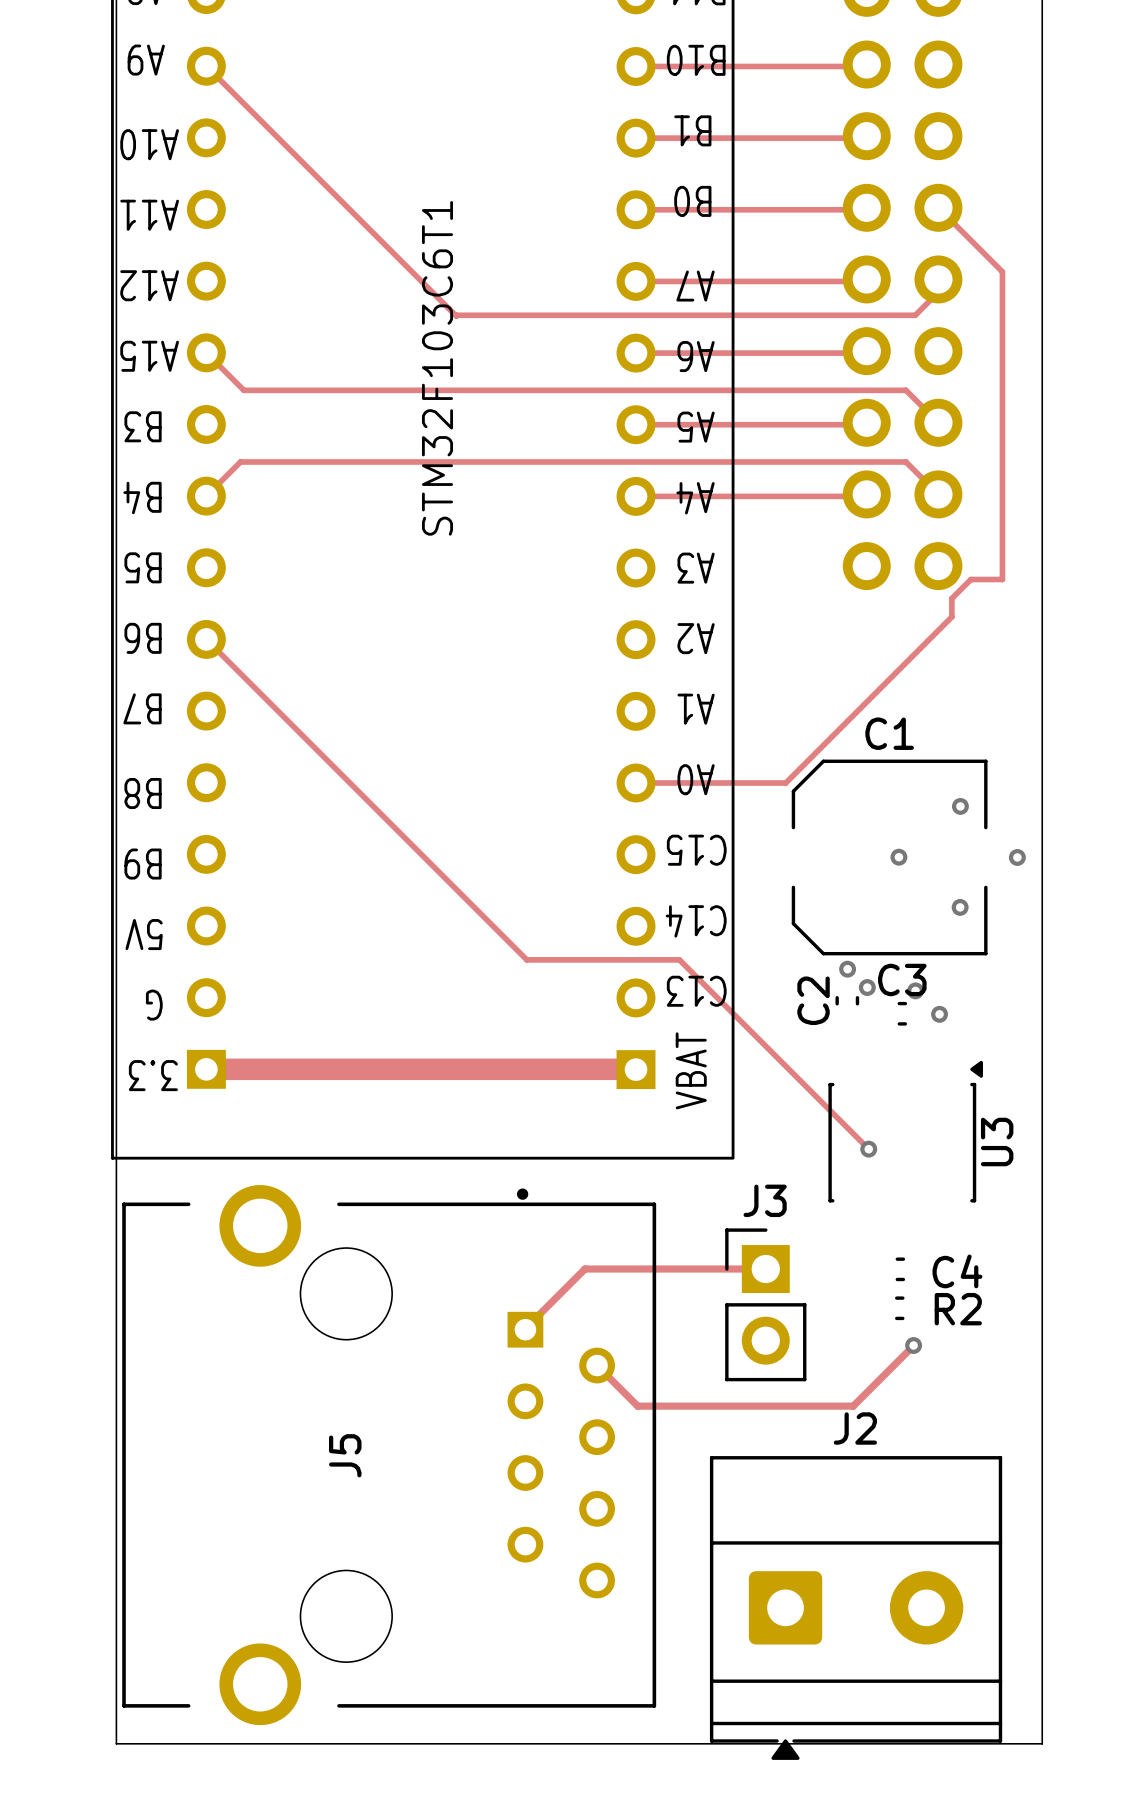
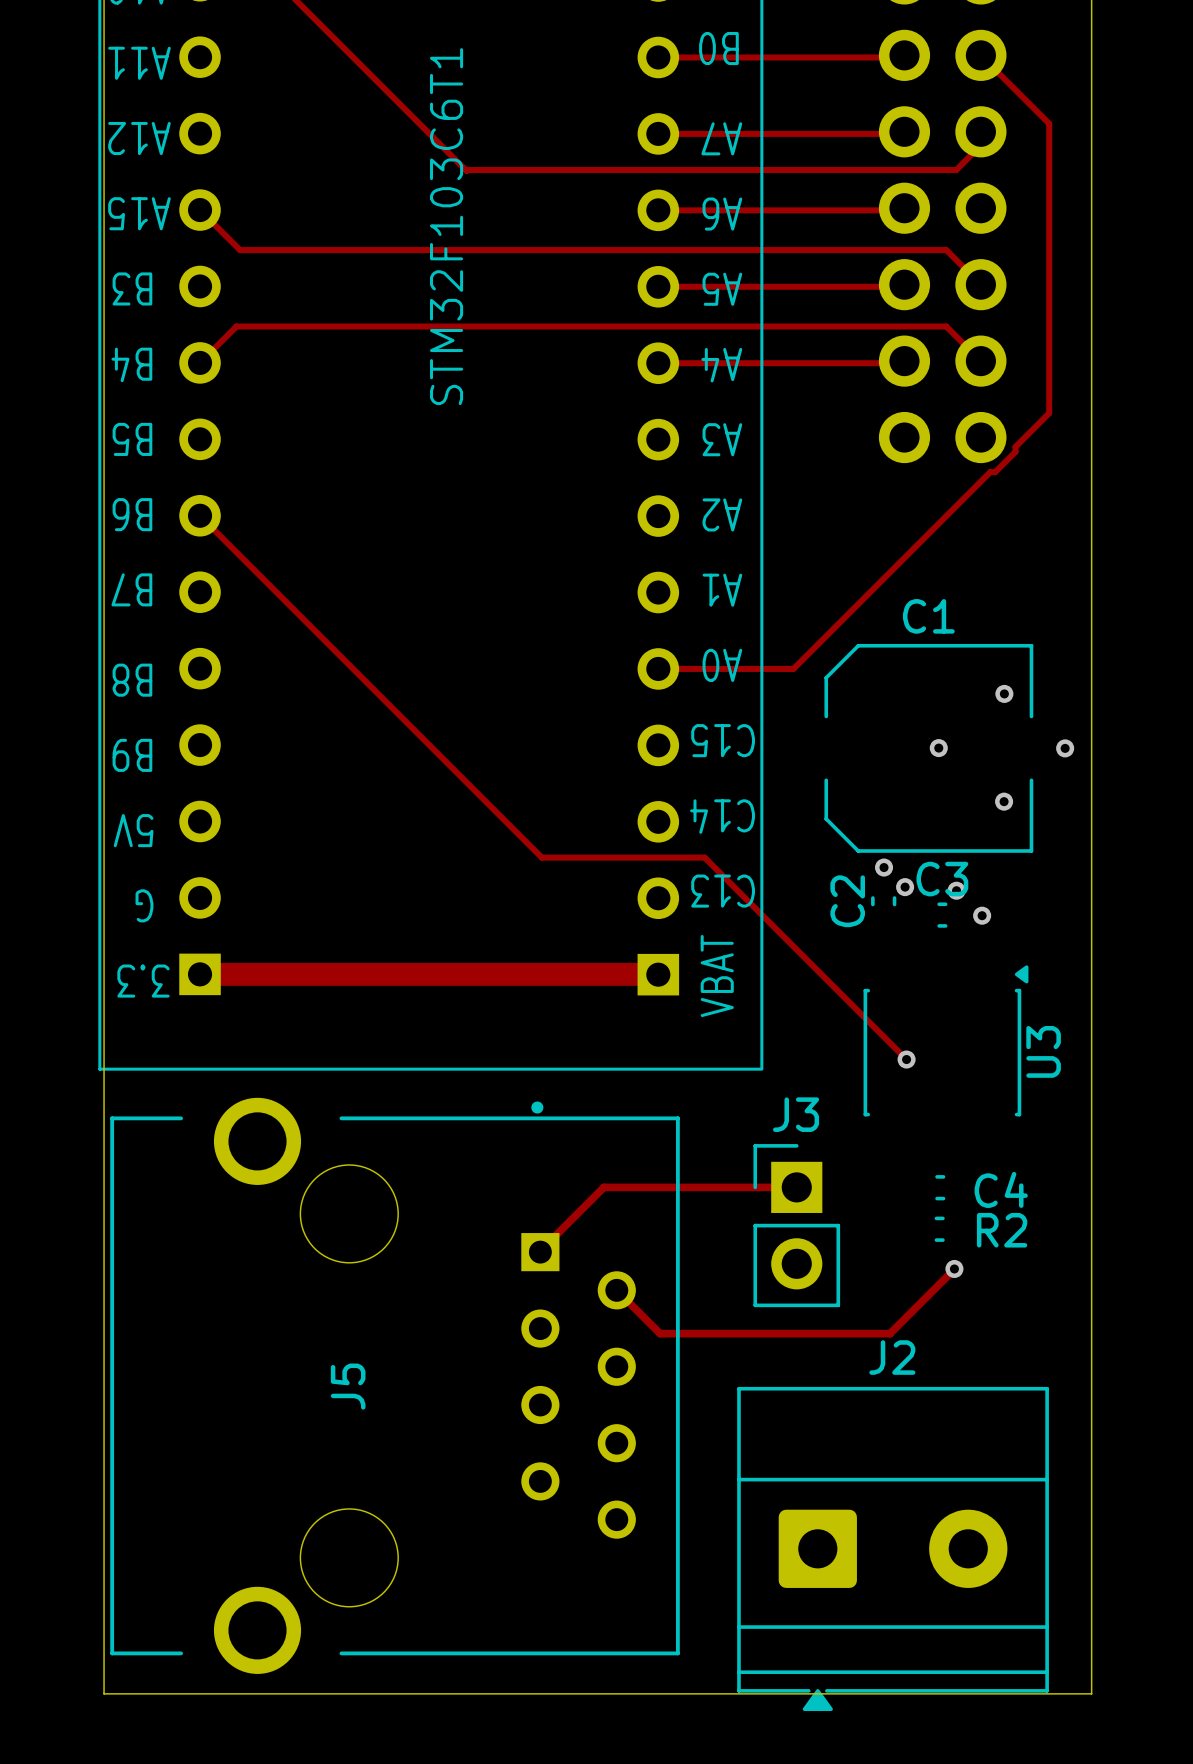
track: (1002, 543) (1002, 579) (970, 579) -> (1049, 413) (1015, 446) (1015, 451)
track: (951, 598) (951, 616) (785, 783) (762, 783) -> (995, 472) (990, 472) (793, 668)

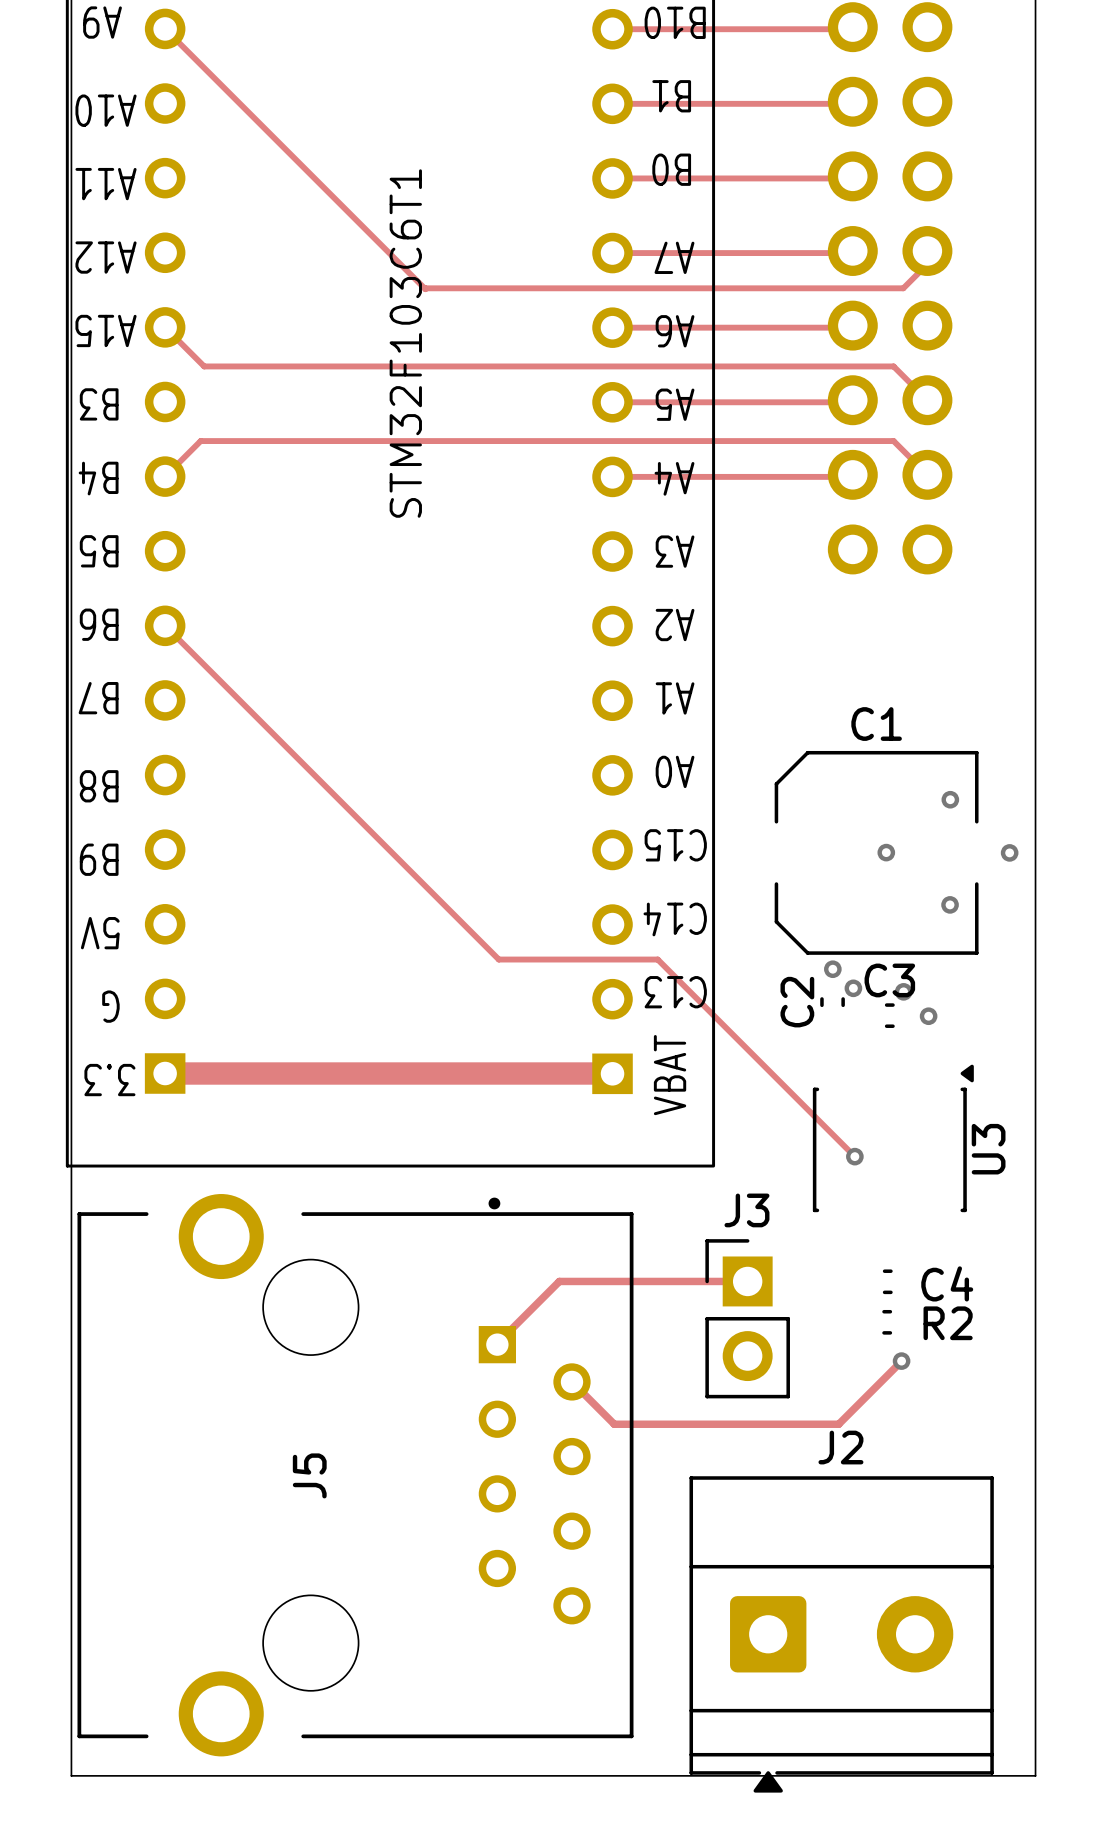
track: (980, 55) (1049, 123) (1049, 413) (1015, 446) (1015, 451) (995, 472) (990, 472) (793, 668) (658, 668) -> none

